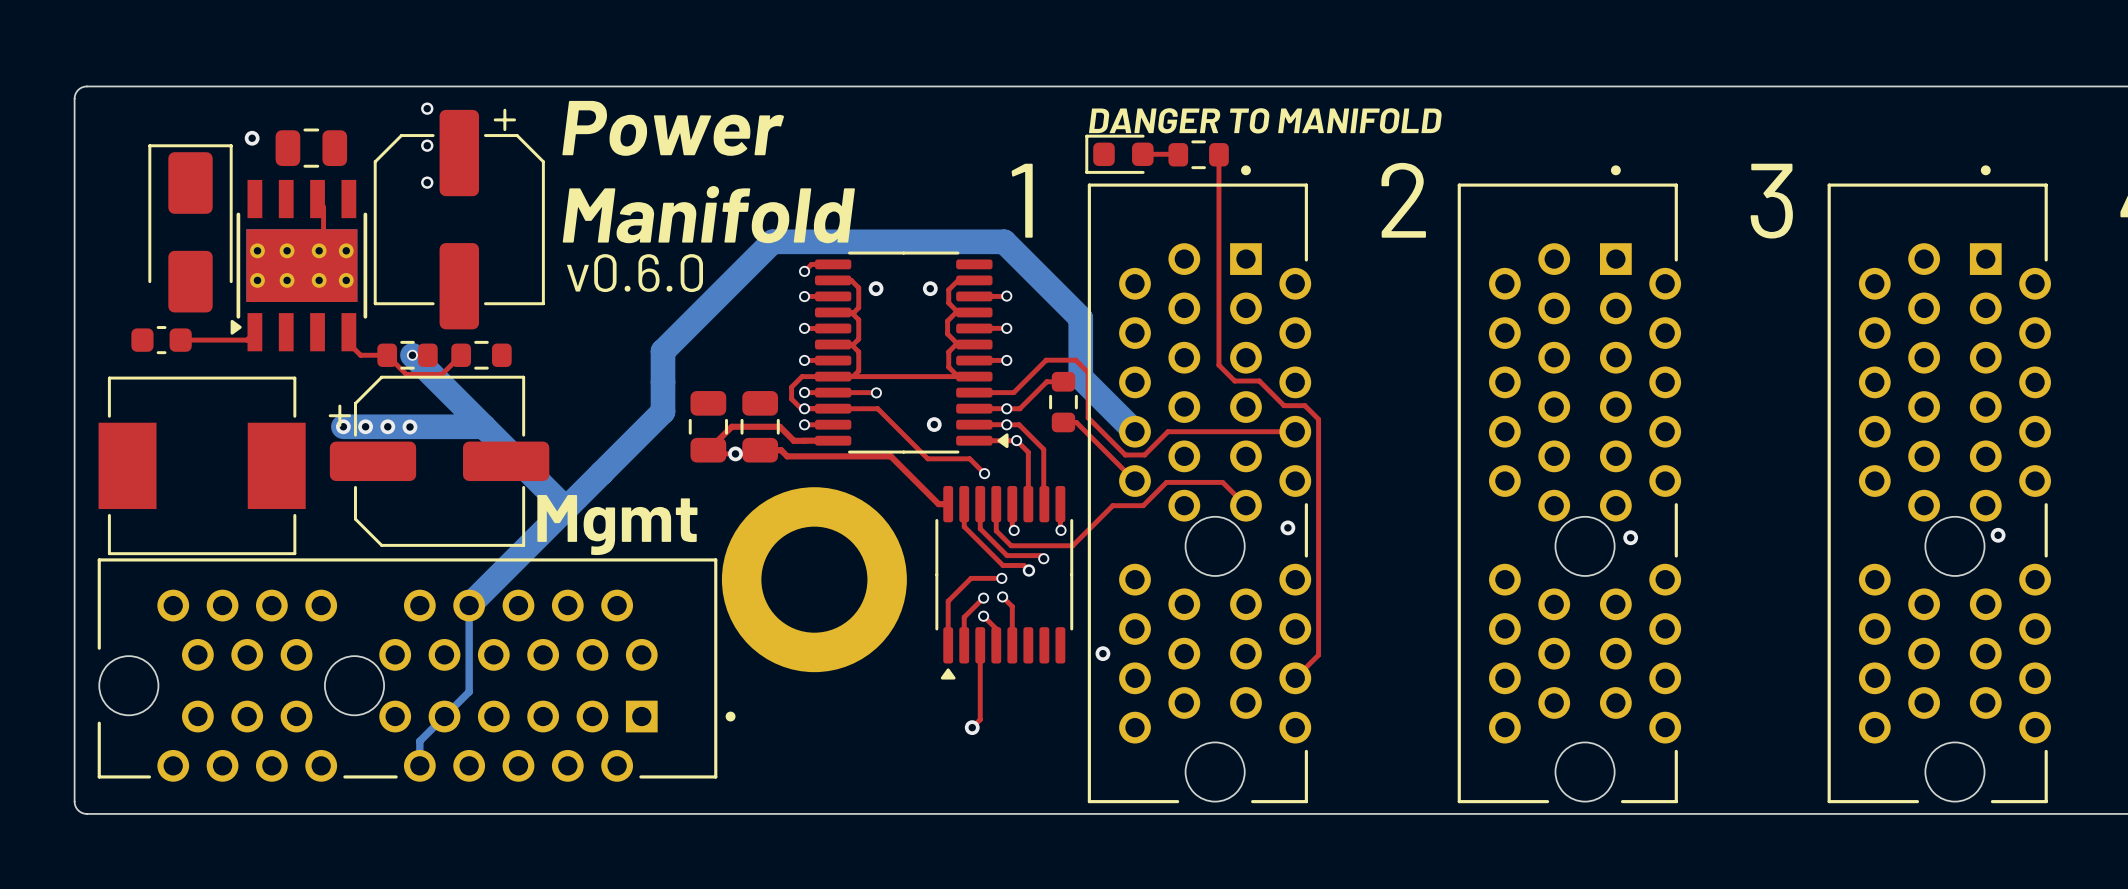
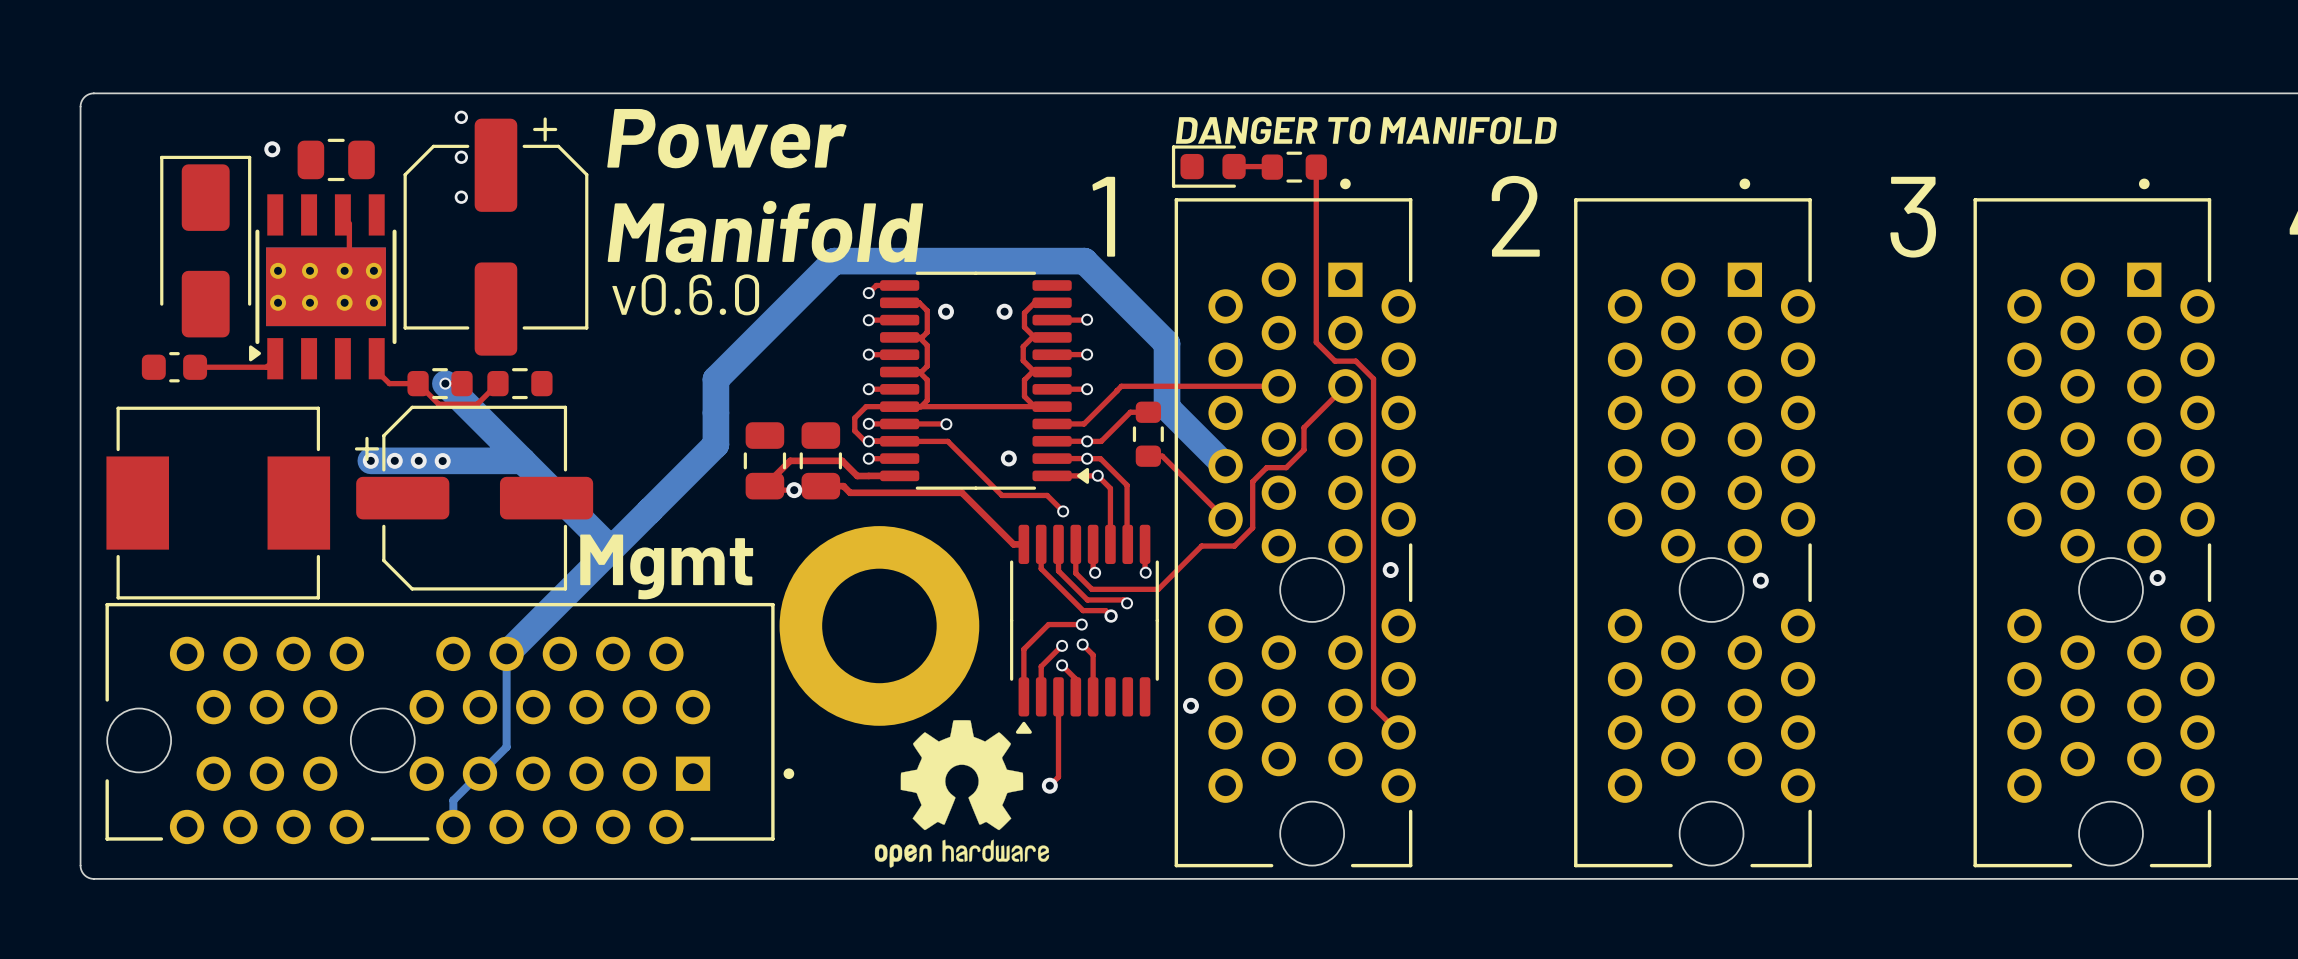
top track: (1218, 317) (1218, 365) (1234, 381) (1259, 381) (1284, 405) (1304, 405) (1318, 419) (1318, 655) (1295, 678) -> (1316, 342) (1335, 361) (1355, 361) (1373, 378) (1373, 707) (1398, 732)
top track: none -> (1278, 386) (1121, 386) (1117, 390)
top track: (1003, 392) (1013, 392) (1046, 360) (1075, 360) (1088, 372) (1088, 417) (1125, 454) (1144, 454) (1167, 431) (1295, 431) -> (1084, 423) (1117, 390)
top track: (1160, 488) (1166, 482) (1222, 482) (1245, 505) -> (1252, 527) (1252, 481) (1266, 467) (1286, 467) (1303, 449) (1303, 427) (1345, 386)
drawing: none -> [874, 720, 1050, 868]

